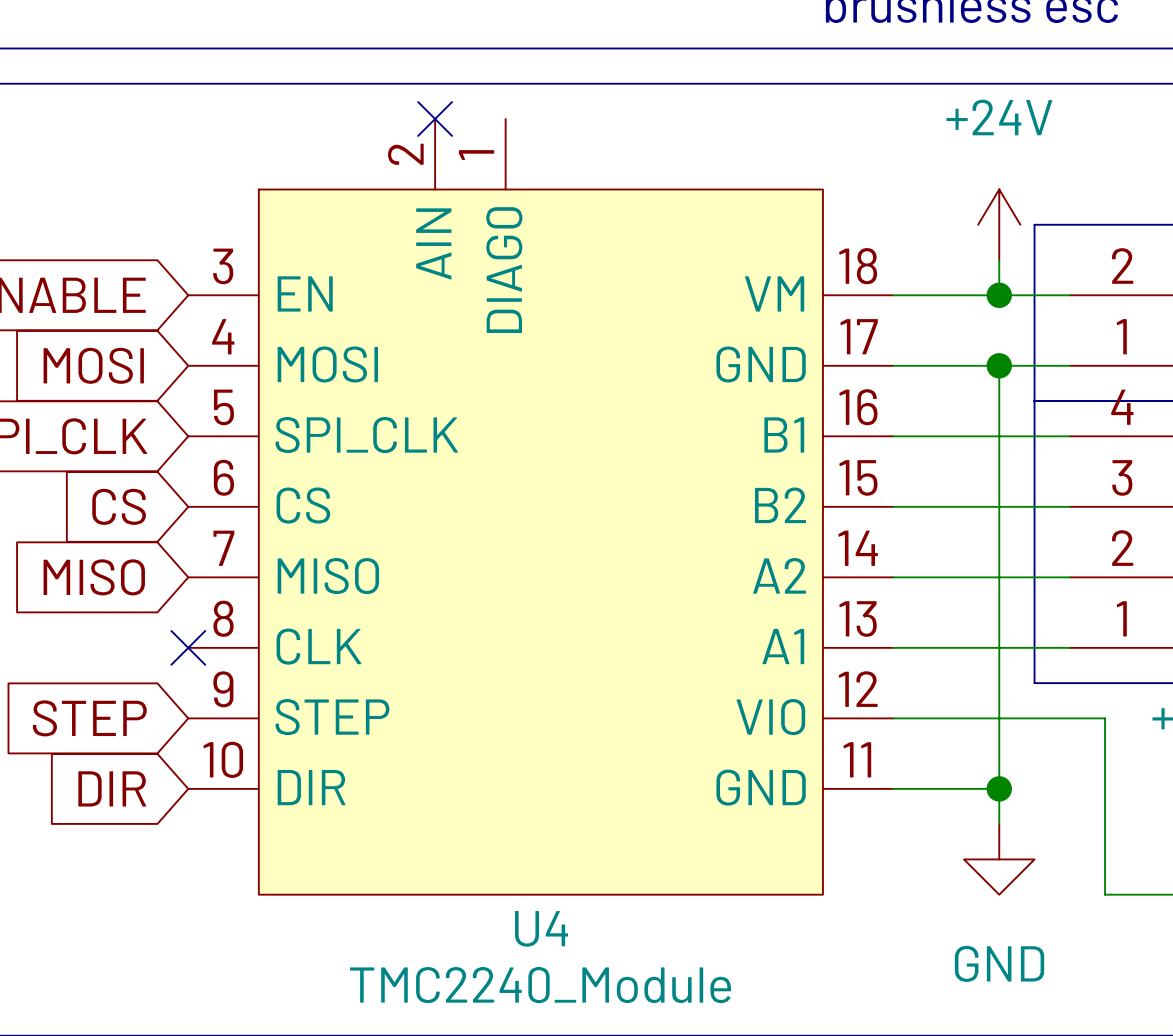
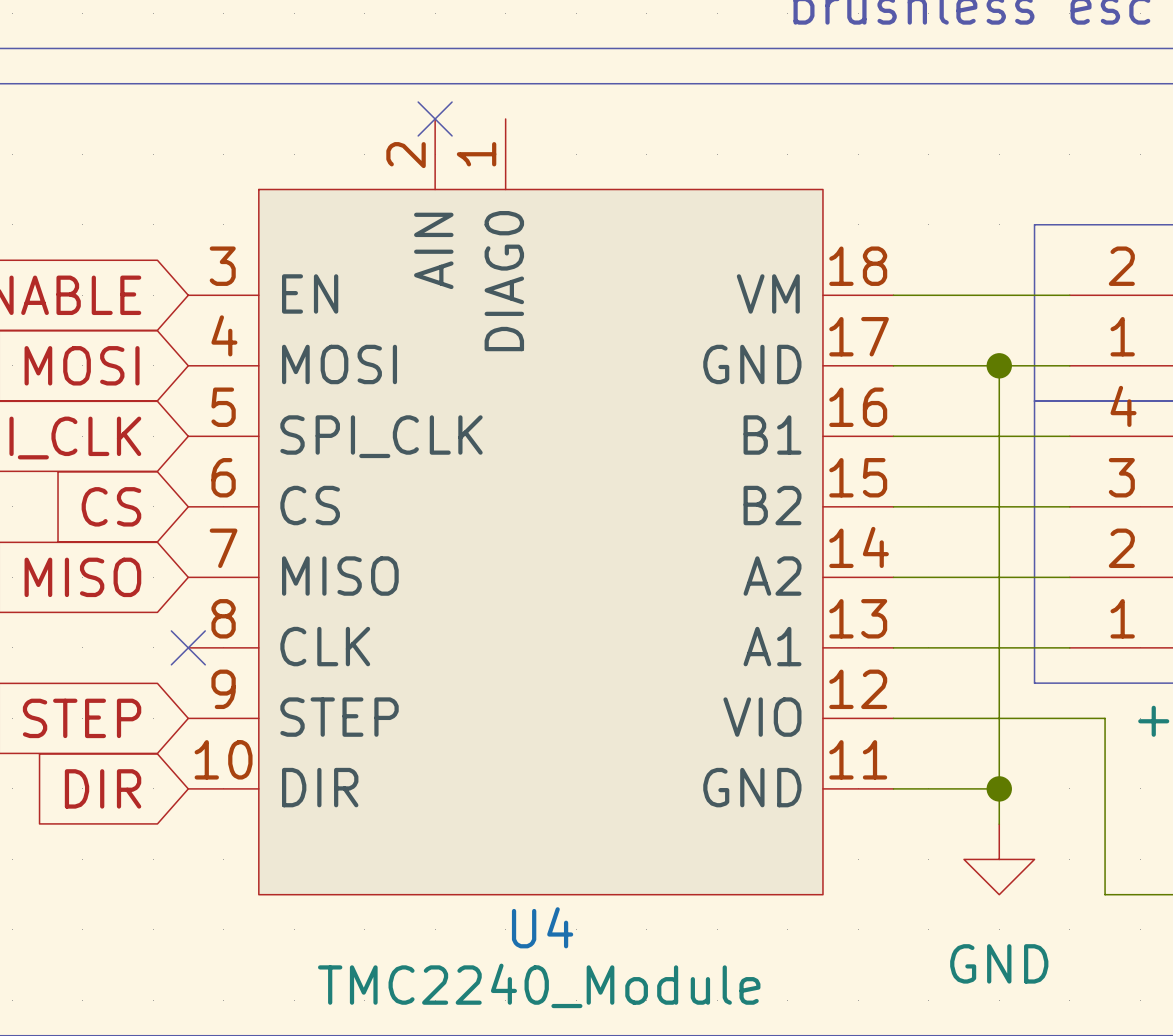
power symbol: +24V (999, 224) -> none
wire: (999, 260) (999, 295) -> none
junction: (999, 295) -> none

